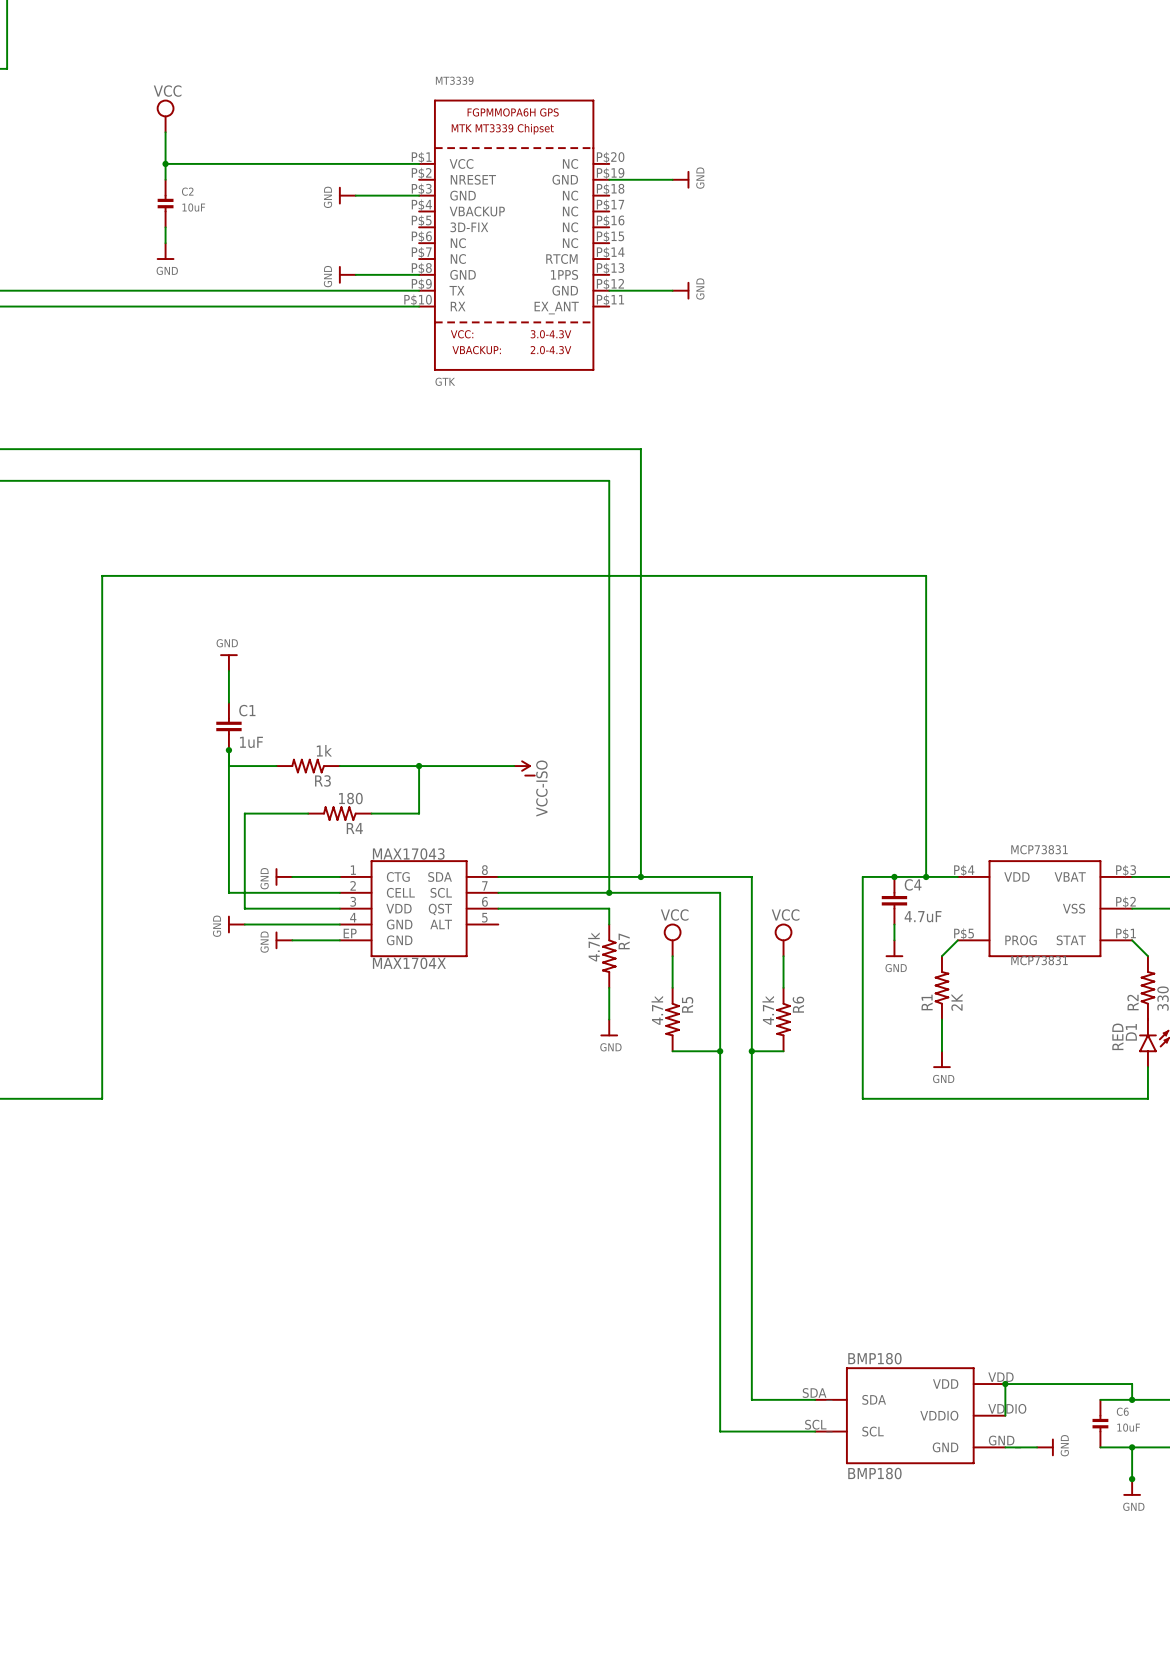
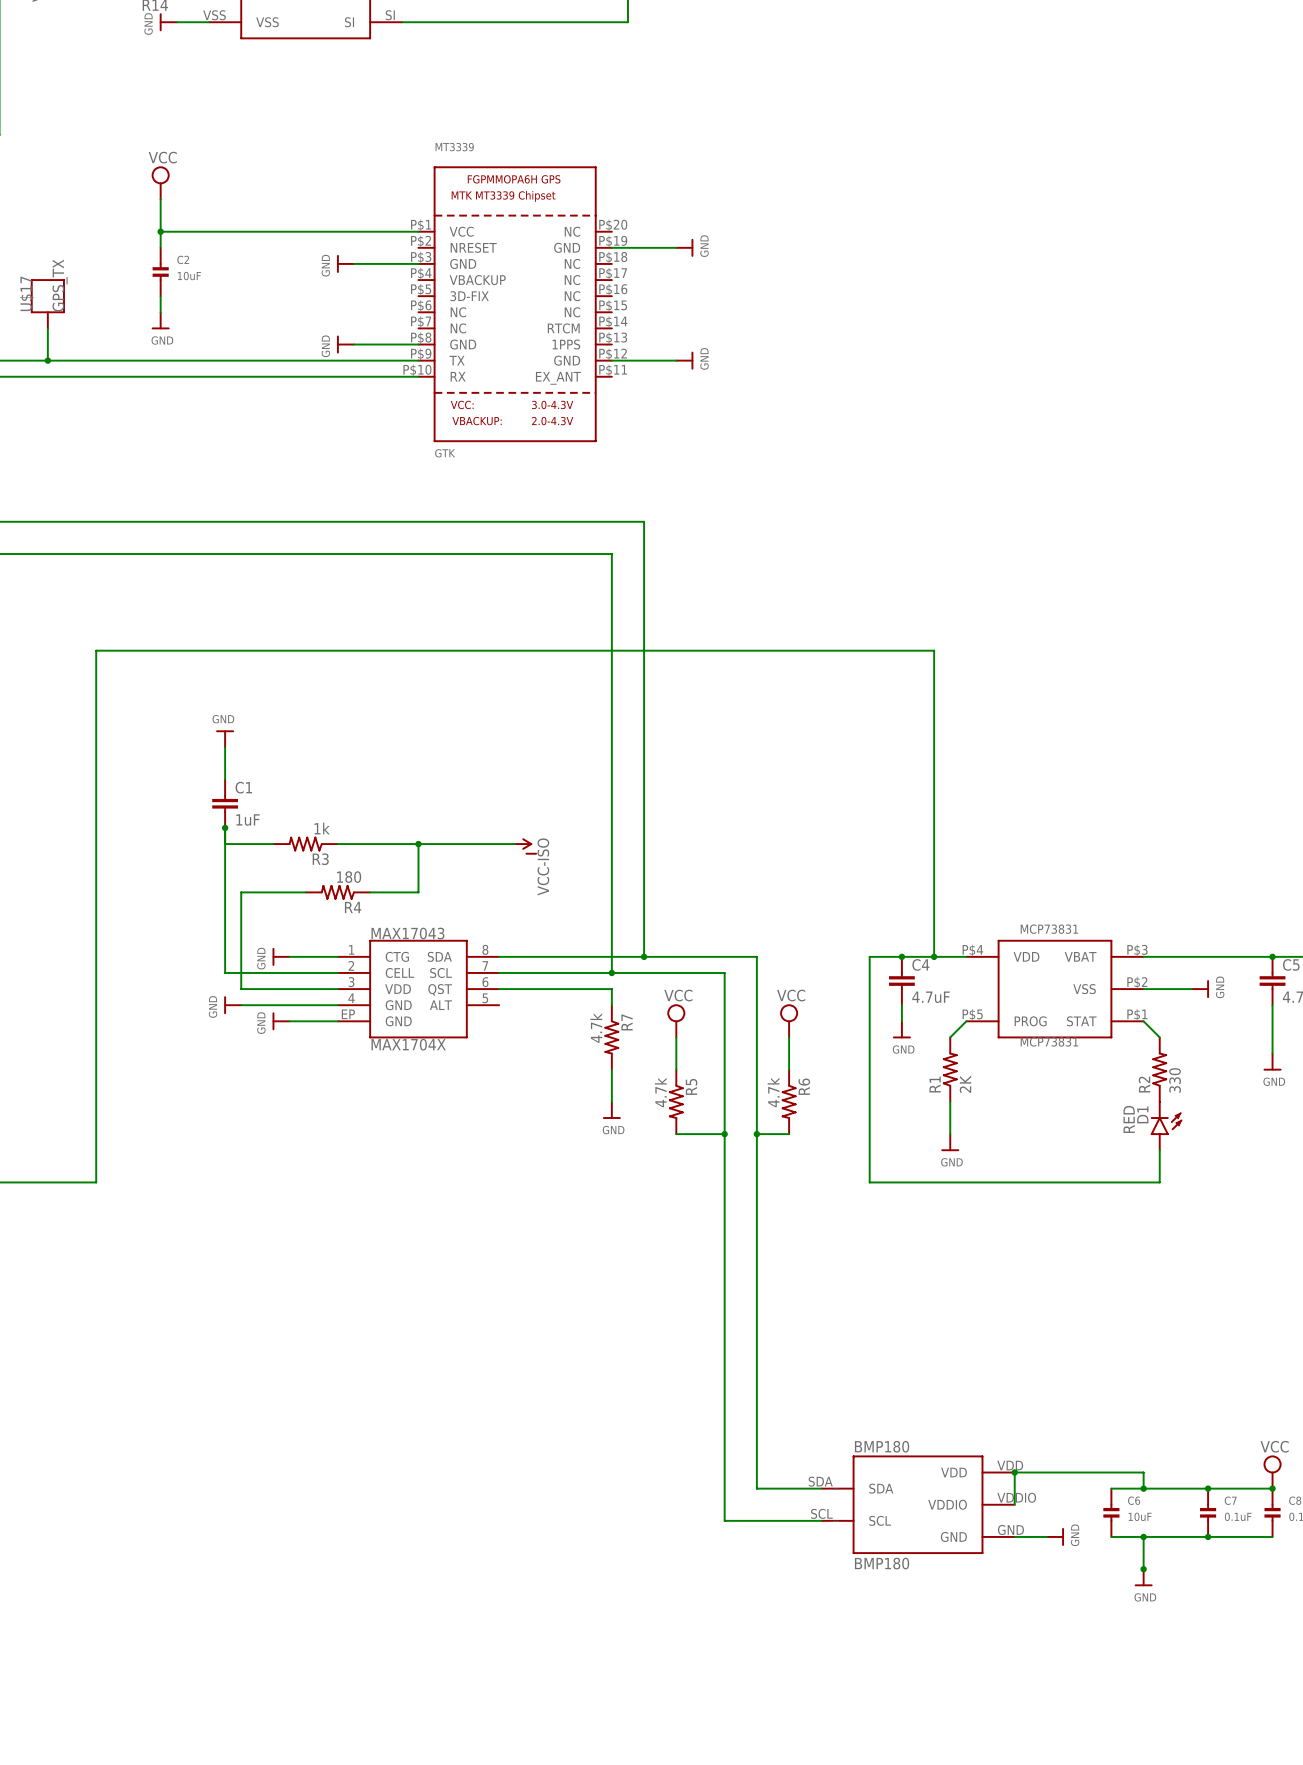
U$17: none -> GPS_TX (47, 303)
wire: none -> (47, 328) (47, 360)
junction: none -> (47, 360)

